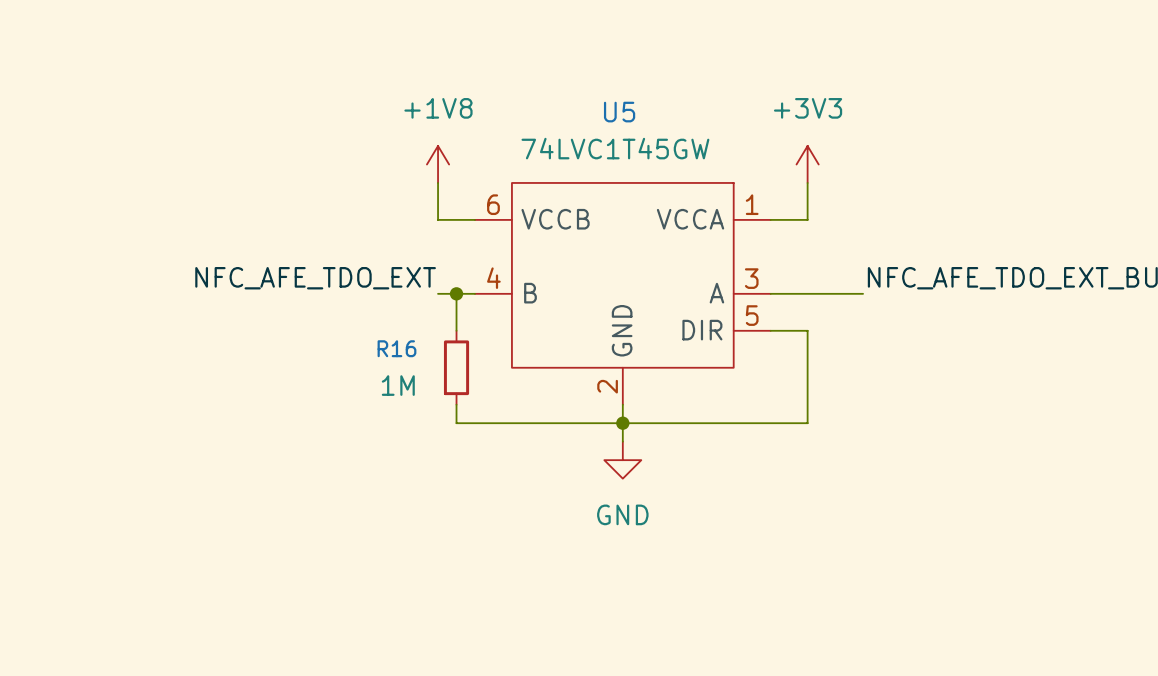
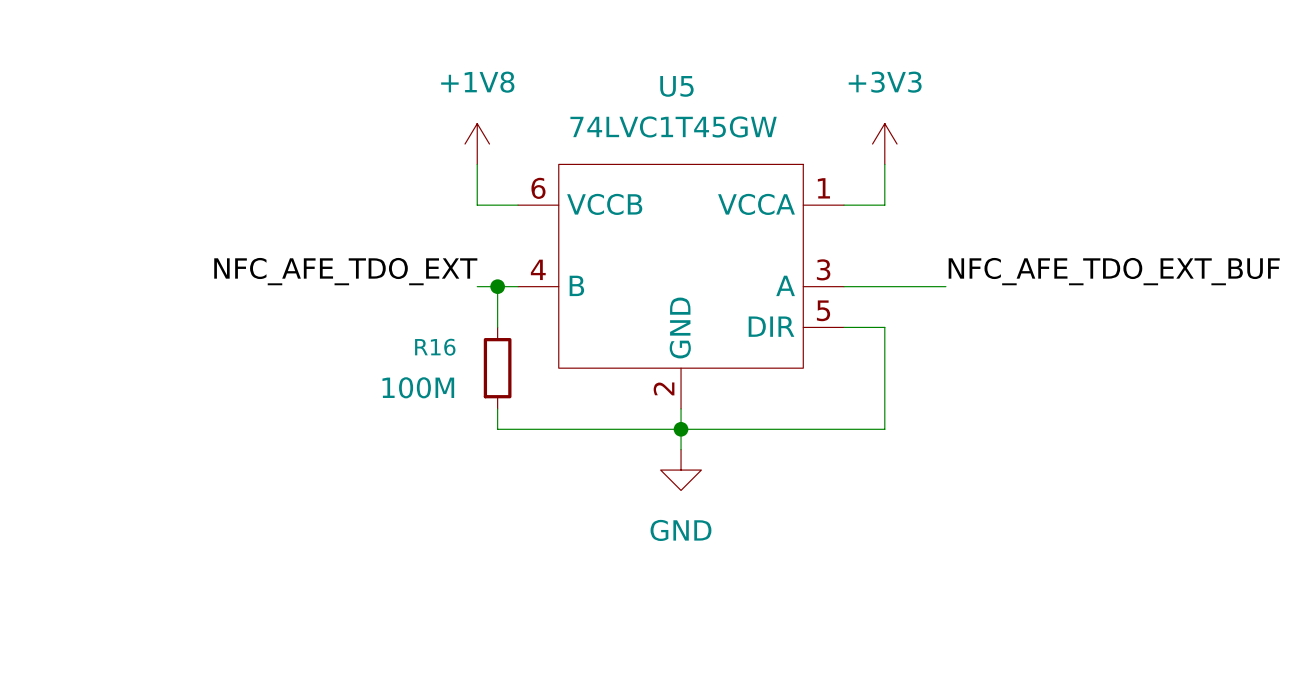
R16 value: 1M (398, 385) -> 100M (418, 387)

